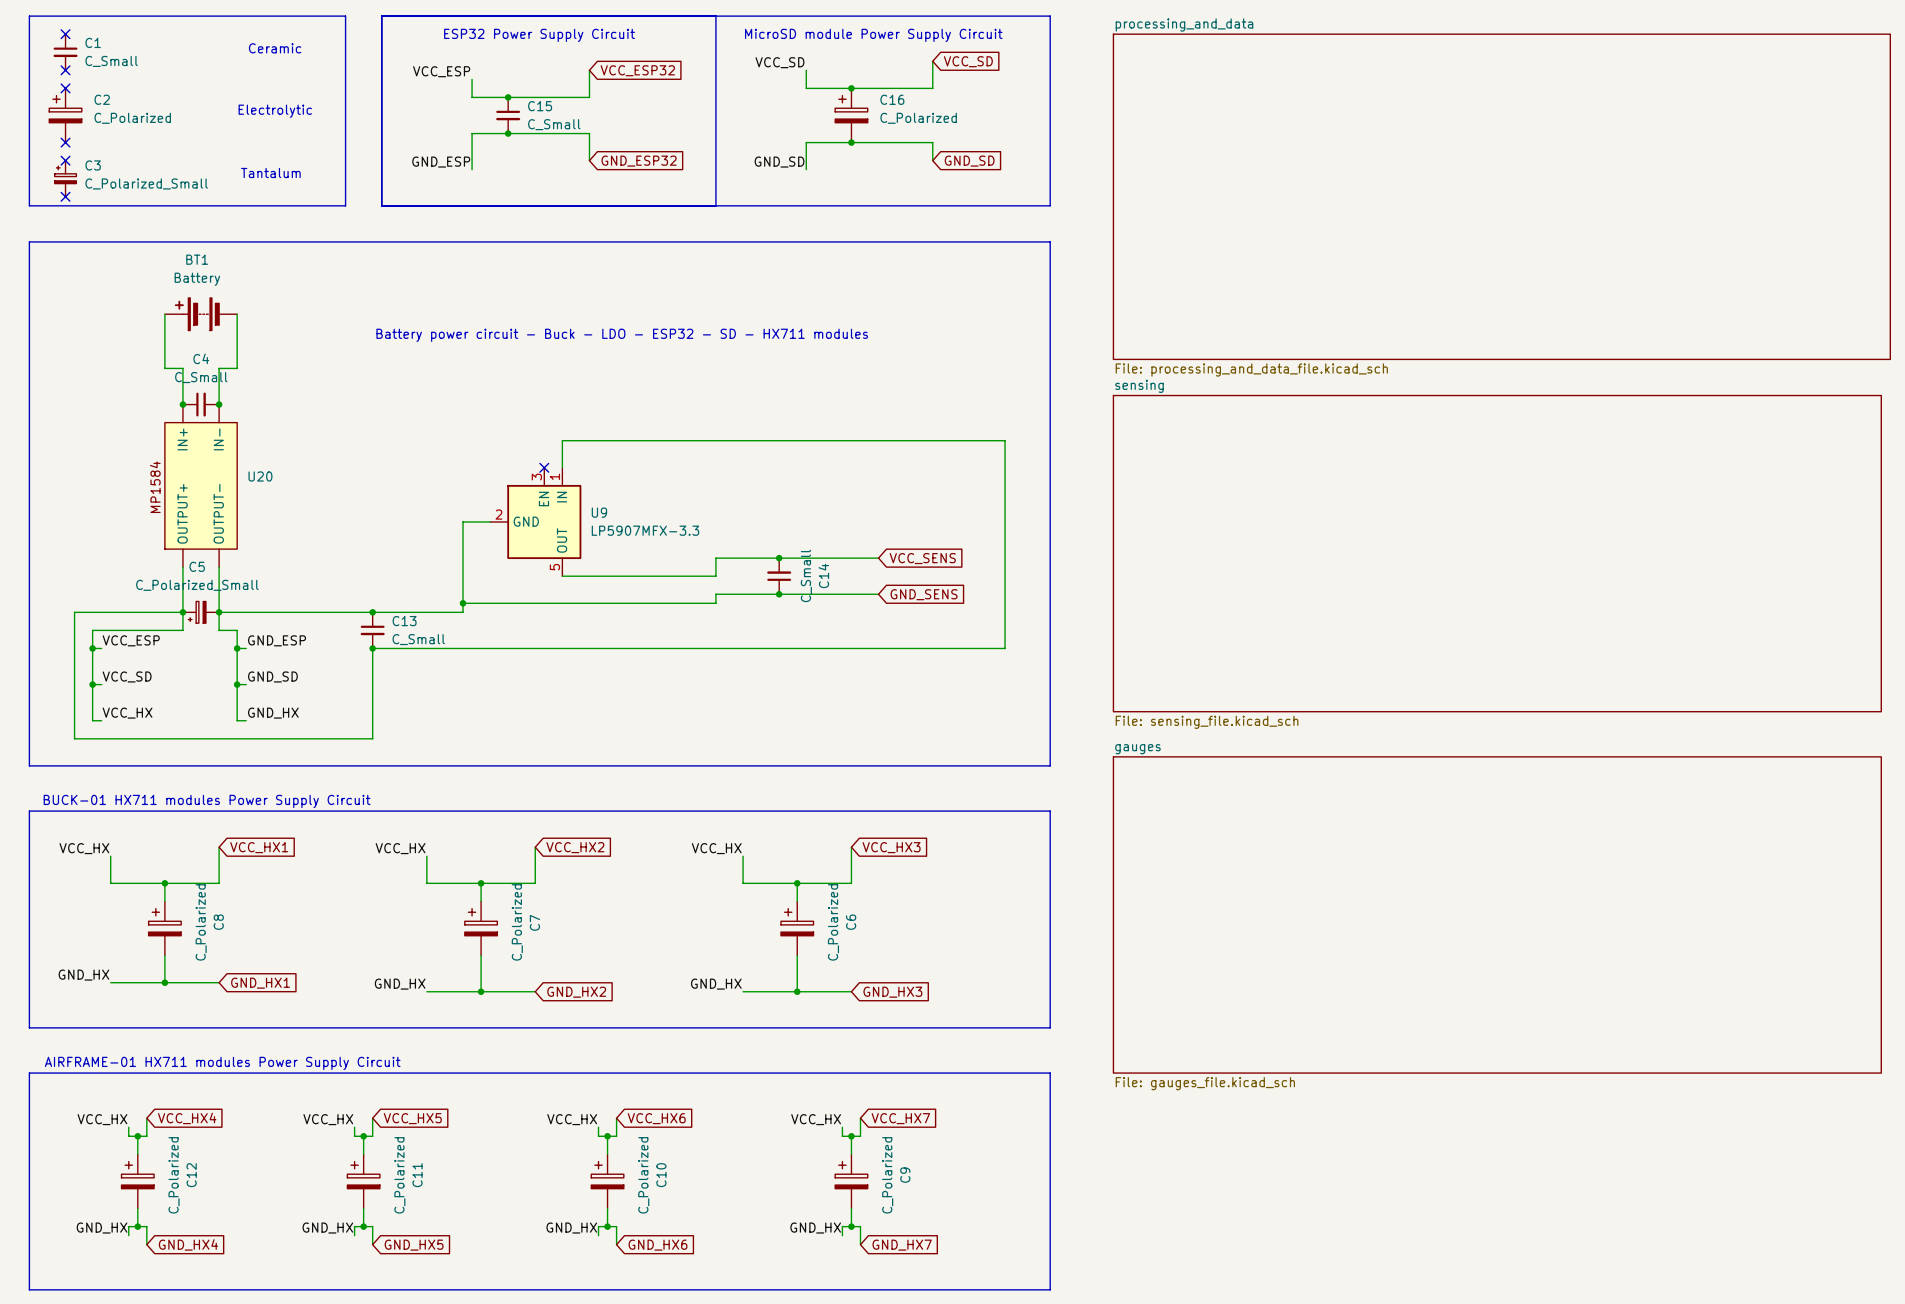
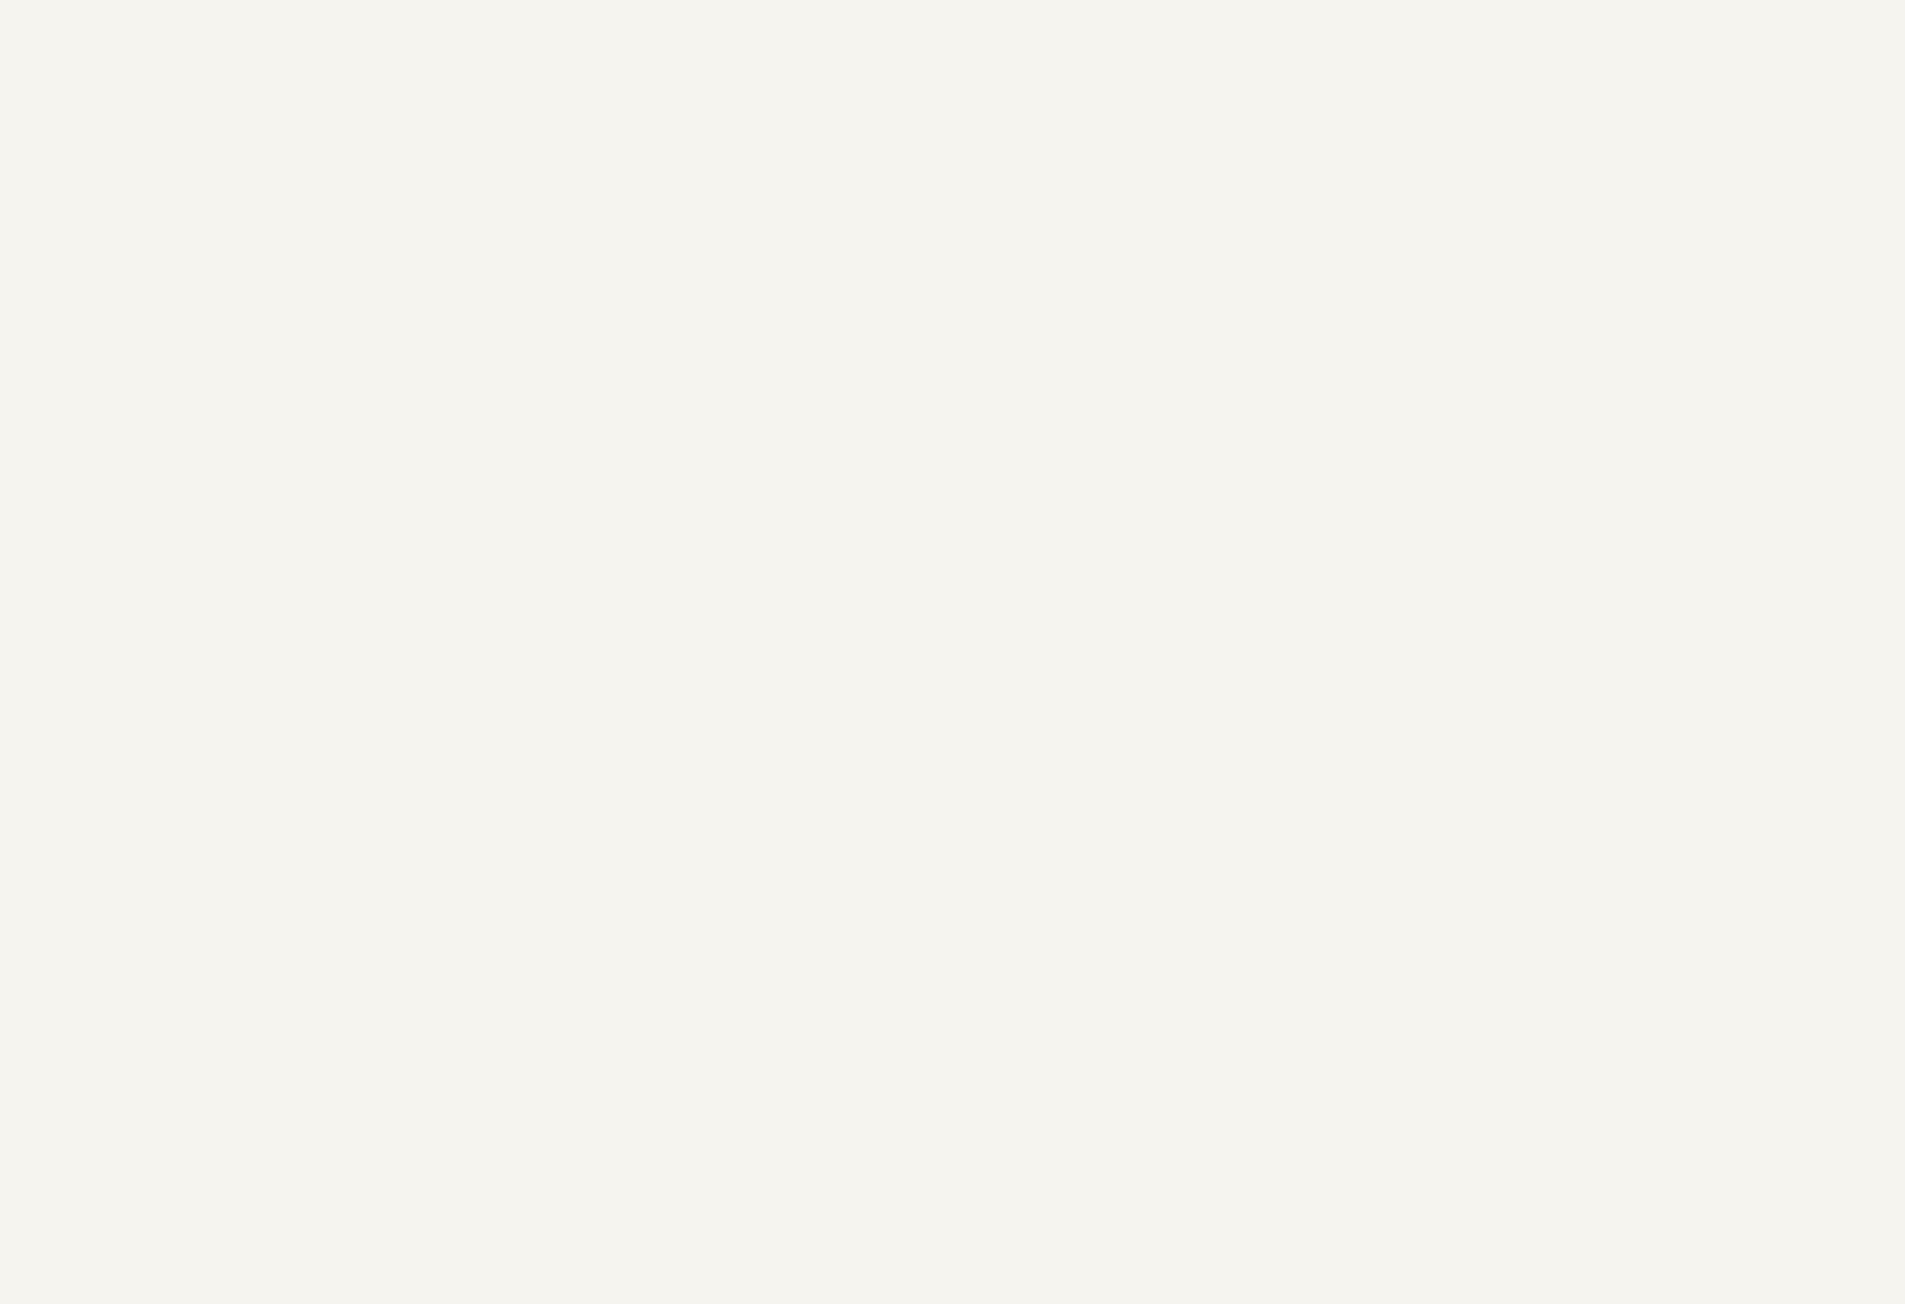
line: (29, 16) (345, 16) (345, 205) (29, 205) (29, 16) -> none
line: (381, 16) (1050, 16) (1050, 205) (381, 205) (381, 16) -> none
line: (715, 16) (715, 205) -> none
no-connect mark: (65, 34) -> none
text: ESP32 Power Supply Circuit (539, 35) -> none
text: MicroSD module Power Supply Circuit (873, 35) -> none
text: Ceramic (275, 48) -> none
C1: C_Small (65, 52) -> none
wire: (932, 61) (932, 88) (806, 88) (806, 70) -> none
global label: VCC_SD (968, 61) -> none
label: VCC_SD (779, 62) -> none
no-connect mark: (65, 70) -> none
wire: (589, 70) (589, 97) (472, 97) (472, 79) -> none
global label: VCC_ESP32 (637, 70) -> none
label: VCC_ESP (441, 71) -> none
no-connect mark: (65, 88) -> none
junction: (851, 88) -> none
junction: (508, 97) -> none
text: Electrolytic (275, 111) -> none
C2: C_Polarized (65, 115) -> none
C15: C_Small (508, 115) -> none
C16: C_Polarized (851, 115) -> none
junction: (508, 133) -> none
no-connect mark: (65, 142) -> none
junction: (851, 142) -> none
no-connect mark: (65, 160) -> none
wire: (589, 160) (589, 133) (472, 133) (472, 169) -> none
wire: (932, 160) (932, 142) (806, 142) (806, 169) -> none
global label: GND_ESP32 (639, 161) -> none
global label: GND_SD (969, 161) -> none
label: GND_ESP (441, 162) -> none
label: GND_SD (779, 162) -> none
text: Tantalum (270, 172) -> none
C3: C_Polarized_Small (65, 178) -> none
no-connect mark: (65, 196) -> none
sheet processing_and_data: File: processing_and_data_file.kicad_sch (1501, 196) -> none
line: (29, 241) (29, 765) (1050, 765) (1050, 241) (29, 241) -> none
wire: (164, 314) (164, 368) (182, 368) (182, 404) -> none
BT1: Battery (201, 314) -> none
wire: (237, 314) (237, 368) (219, 368) (219, 404) -> none
text: Battery power circuit - Buck - LDO - ESP32 - SD - HX711 modules (622, 335) -> none
junction: (182, 404) -> none
C4: C_Small (201, 404) -> none
junction: (219, 404) -> none
no-connect mark: (544, 467) -> none
wire: (562, 467) (562, 440) (1005, 440) (1005, 648) (372, 648) (372, 738) (74, 738) (74, 612) (182, 612) -> none
U20: (201, 485) -> none
wire: (490, 522) (463, 522) (463, 612) (219, 612) -> none
U9: LP5907MFX-3.3 (535, 522) -> none
sheet sensing: File: sensing_file.kicad_sch (1497, 553) -> none
junction: (779, 558) -> none
wire: (878, 558) (715, 558) (715, 576) (562, 576) -> none
global label: VCC_SENS (922, 558) -> none
wire: (182, 567) (182, 630) (92, 630) (92, 720) (101, 720) -> none
wire: (219, 567) (219, 630) (237, 630) (237, 720) (246, 720) -> none
C14: C_Small (779, 576) -> none
junction: (779, 594) -> none
wire: (878, 594) (715, 594) (715, 603) (463, 603) -> none
global label: GND_SENS (924, 594) -> none
junction: (463, 603) -> none
junction: (182, 612) -> none
C5: C_Polarized_Small (201, 612) -> none
junction: (219, 612) -> none
junction: (372, 612) -> none
C13: C_Small (372, 630) -> none
label: VCC_ESP (131, 640) -> none
label: GND_ESP (277, 640) -> none
wire: (92, 648) (101, 648) -> none
junction: (92, 648) -> none
wire: (237, 648) (246, 648) -> none
junction: (237, 648) -> none
junction: (372, 648) -> none
label: VCC_SD (127, 676) -> none
label: GND_SD (272, 676) -> none
wire: (92, 684) (101, 684) -> none
junction: (92, 684) -> none
wire: (237, 684) (246, 684) -> none
junction: (237, 684) -> none
label: VCC_HX (127, 713) -> none
label: GND_HX (273, 713) -> none
text: BUCK-01 HX711 modules Power Supply Circuit (207, 801) -> none
line: (29, 811) (29, 1027) (1050, 1027) (1050, 811) (29, 811) -> none
wire: (219, 847) (219, 883) (110, 883) (110, 856) -> none
global label: VCC_HX1 (259, 847) -> none
wire: (535, 847) (535, 883) (426, 883) (426, 856) -> none
global label: VCC_HX2 (575, 847) -> none
wire: (851, 847) (851, 883) (743, 883) (743, 856) -> none
global label: VCC_HX3 (891, 847) -> none
label: VCC_HX (84, 848) -> none
label: VCC_HX (400, 848) -> none
label: VCC_HX (716, 848) -> none
wire: (164, 883) (164, 901) -> none
junction: (164, 883) -> none
wire: (481, 883) (481, 901) -> none
junction: (481, 883) -> none
wire: (797, 883) (797, 901) -> none
junction: (797, 883) -> none
sheet gauges: File: gauges_file.kicad_sch (1497, 914) -> none
C8: C_Polarized (164, 928) -> none
C7: C_Polarized (481, 928) -> none
C6: C_Polarized (797, 928) -> none
wire: (164, 955) (164, 982) -> none
wire: (481, 955) (481, 991) -> none
wire: (797, 955) (797, 991) -> none
label: GND_HX (83, 975) -> none
wire: (110, 982) (219, 982) -> none
junction: (164, 982) -> none
global label: GND_HX1 (260, 983) -> none
label: GND_HX (400, 984) -> none
label: GND_HX (716, 984) -> none
wire: (426, 991) (535, 991) -> none
junction: (481, 991) -> none
wire: (743, 991) (851, 991) -> none
junction: (797, 991) -> none
global label: GND_HX2 (576, 992) -> none
global label: GND_HX3 (892, 992) -> none
text: AIRFRAME-01 HX711 modules Power Supply Circuit (222, 1063) -> none
line: (29, 1073) (29, 1289) (1050, 1289) (1050, 1073) (29, 1073) -> none
wire: (146, 1118) (146, 1136) (128, 1136) (128, 1127) -> none
global label: VCC_HX4 (187, 1118) -> none
wire: (372, 1118) (372, 1136) (354, 1136) (354, 1127) -> none
global label: VCC_HX5 (412, 1118) -> none
wire: (616, 1118) (616, 1136) (598, 1136) (598, 1127) -> none
global label: VCC_HX6 (656, 1118) -> none
wire: (860, 1118) (860, 1136) (842, 1136) (842, 1127) -> none
global label: VCC_HX7 (900, 1118) -> none
label: VCC_HX (102, 1119) -> none
label: VCC_HX (328, 1119) -> none
label: VCC_HX (572, 1119) -> none
label: VCC_HX (816, 1119) -> none
wire: (137, 1136) (137, 1154) -> none
junction: (137, 1136) -> none
wire: (363, 1136) (363, 1154) -> none
junction: (363, 1136) -> none
wire: (607, 1136) (607, 1154) -> none
junction: (607, 1136) -> none
wire: (851, 1136) (851, 1154) -> none
junction: (851, 1136) -> none
C12: C_Polarized (137, 1181) -> none
C11: C_Polarized (363, 1181) -> none
C10: C_Polarized (607, 1181) -> none
C9: C_Polarized (851, 1181) -> none
wire: (137, 1208) (137, 1226) -> none
wire: (363, 1208) (363, 1226) -> none
wire: (607, 1208) (607, 1226) -> none
wire: (851, 1208) (851, 1226) -> none
junction: (137, 1226) -> none
junction: (363, 1226) -> none
junction: (607, 1226) -> none
junction: (851, 1226) -> none
label: GND_HX (102, 1228) -> none
label: GND_HX (327, 1228) -> none
label: GND_HX (571, 1228) -> none
label: GND_HX (815, 1228) -> none
wire: (128, 1235) (128, 1226) (146, 1226) (146, 1244) -> none
wire: (354, 1235) (354, 1226) (372, 1226) (372, 1244) -> none
wire: (598, 1235) (598, 1226) (616, 1226) (616, 1244) -> none
wire: (842, 1235) (842, 1226) (860, 1226) (860, 1244) -> none
global label: GND_HX4 (188, 1244) -> none
global label: GND_HX5 (414, 1245) -> none
global label: GND_HX6 (657, 1245) -> none
global label: GND_HX7 (902, 1245) -> none

